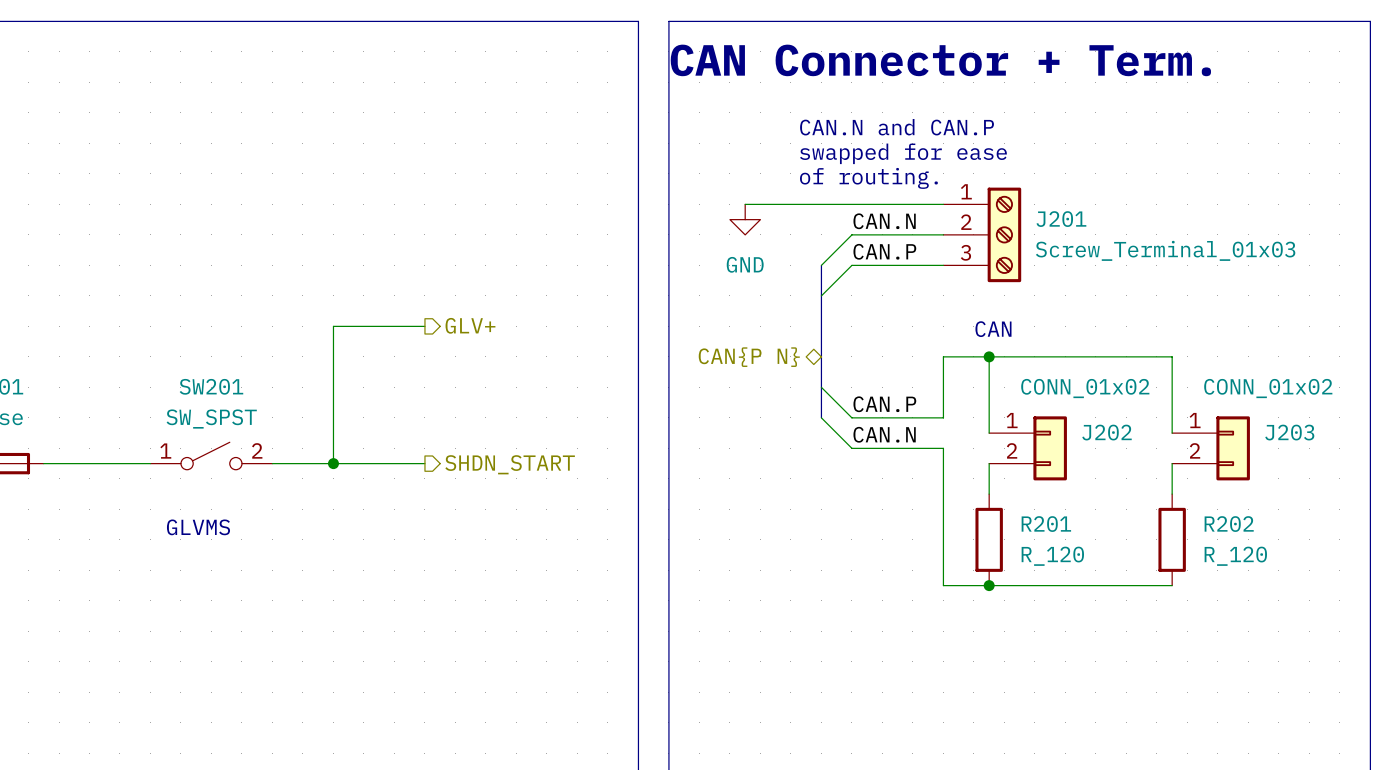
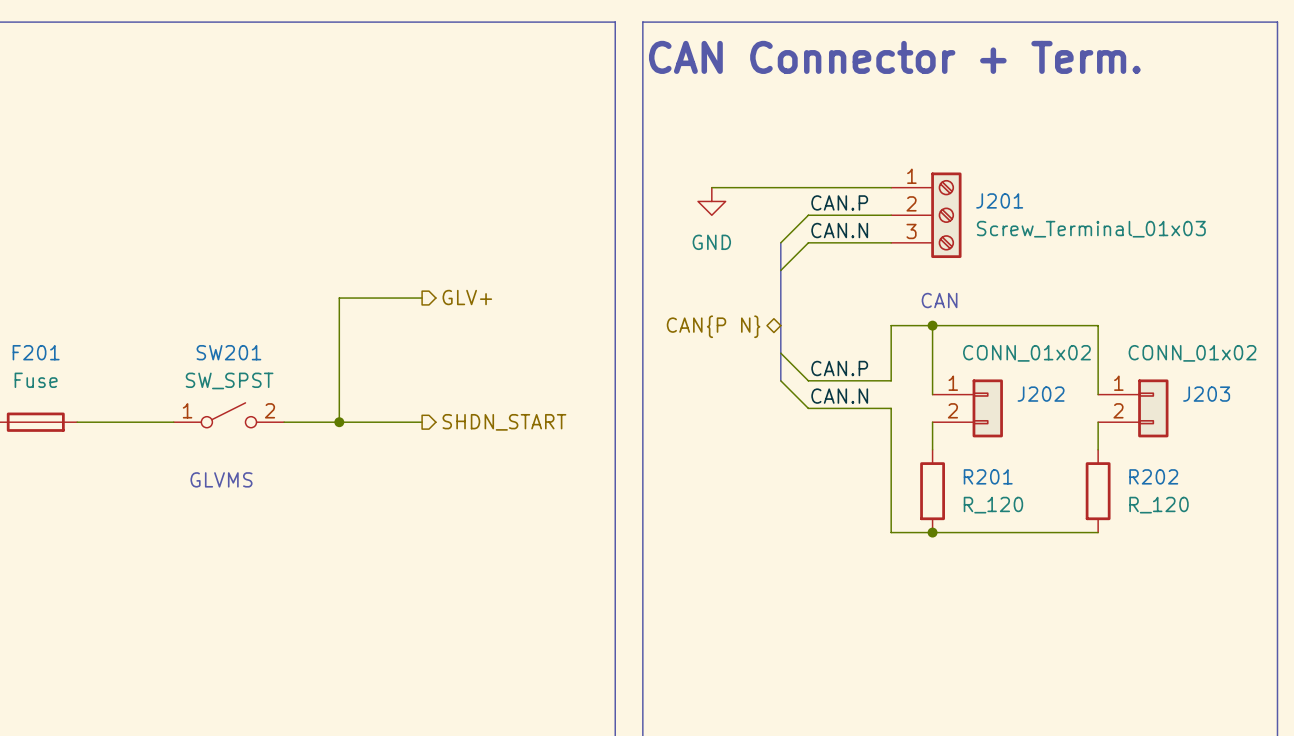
text: CAN.N and CAN.P (897, 127) -> none
text: swapped for ease (903, 153) -> none
text: of routing. (868, 178) -> none
label: CAN.N (884, 221) -> CAN.P (839, 202)
label: CAN.P (884, 251) -> CAN.N (839, 230)

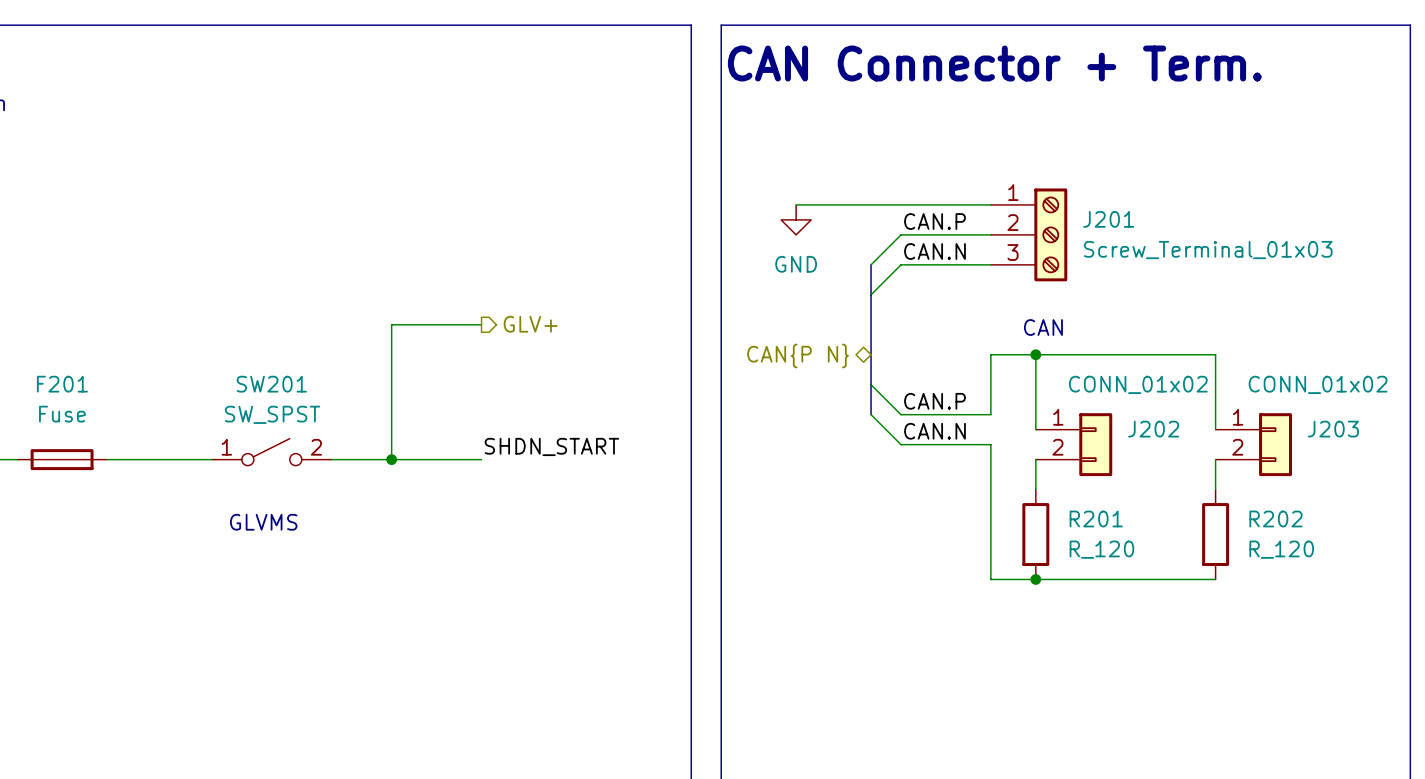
label: none -> SHDN_START (551, 446)
hierarchical label: SHDN_START (504, 422) -> none

